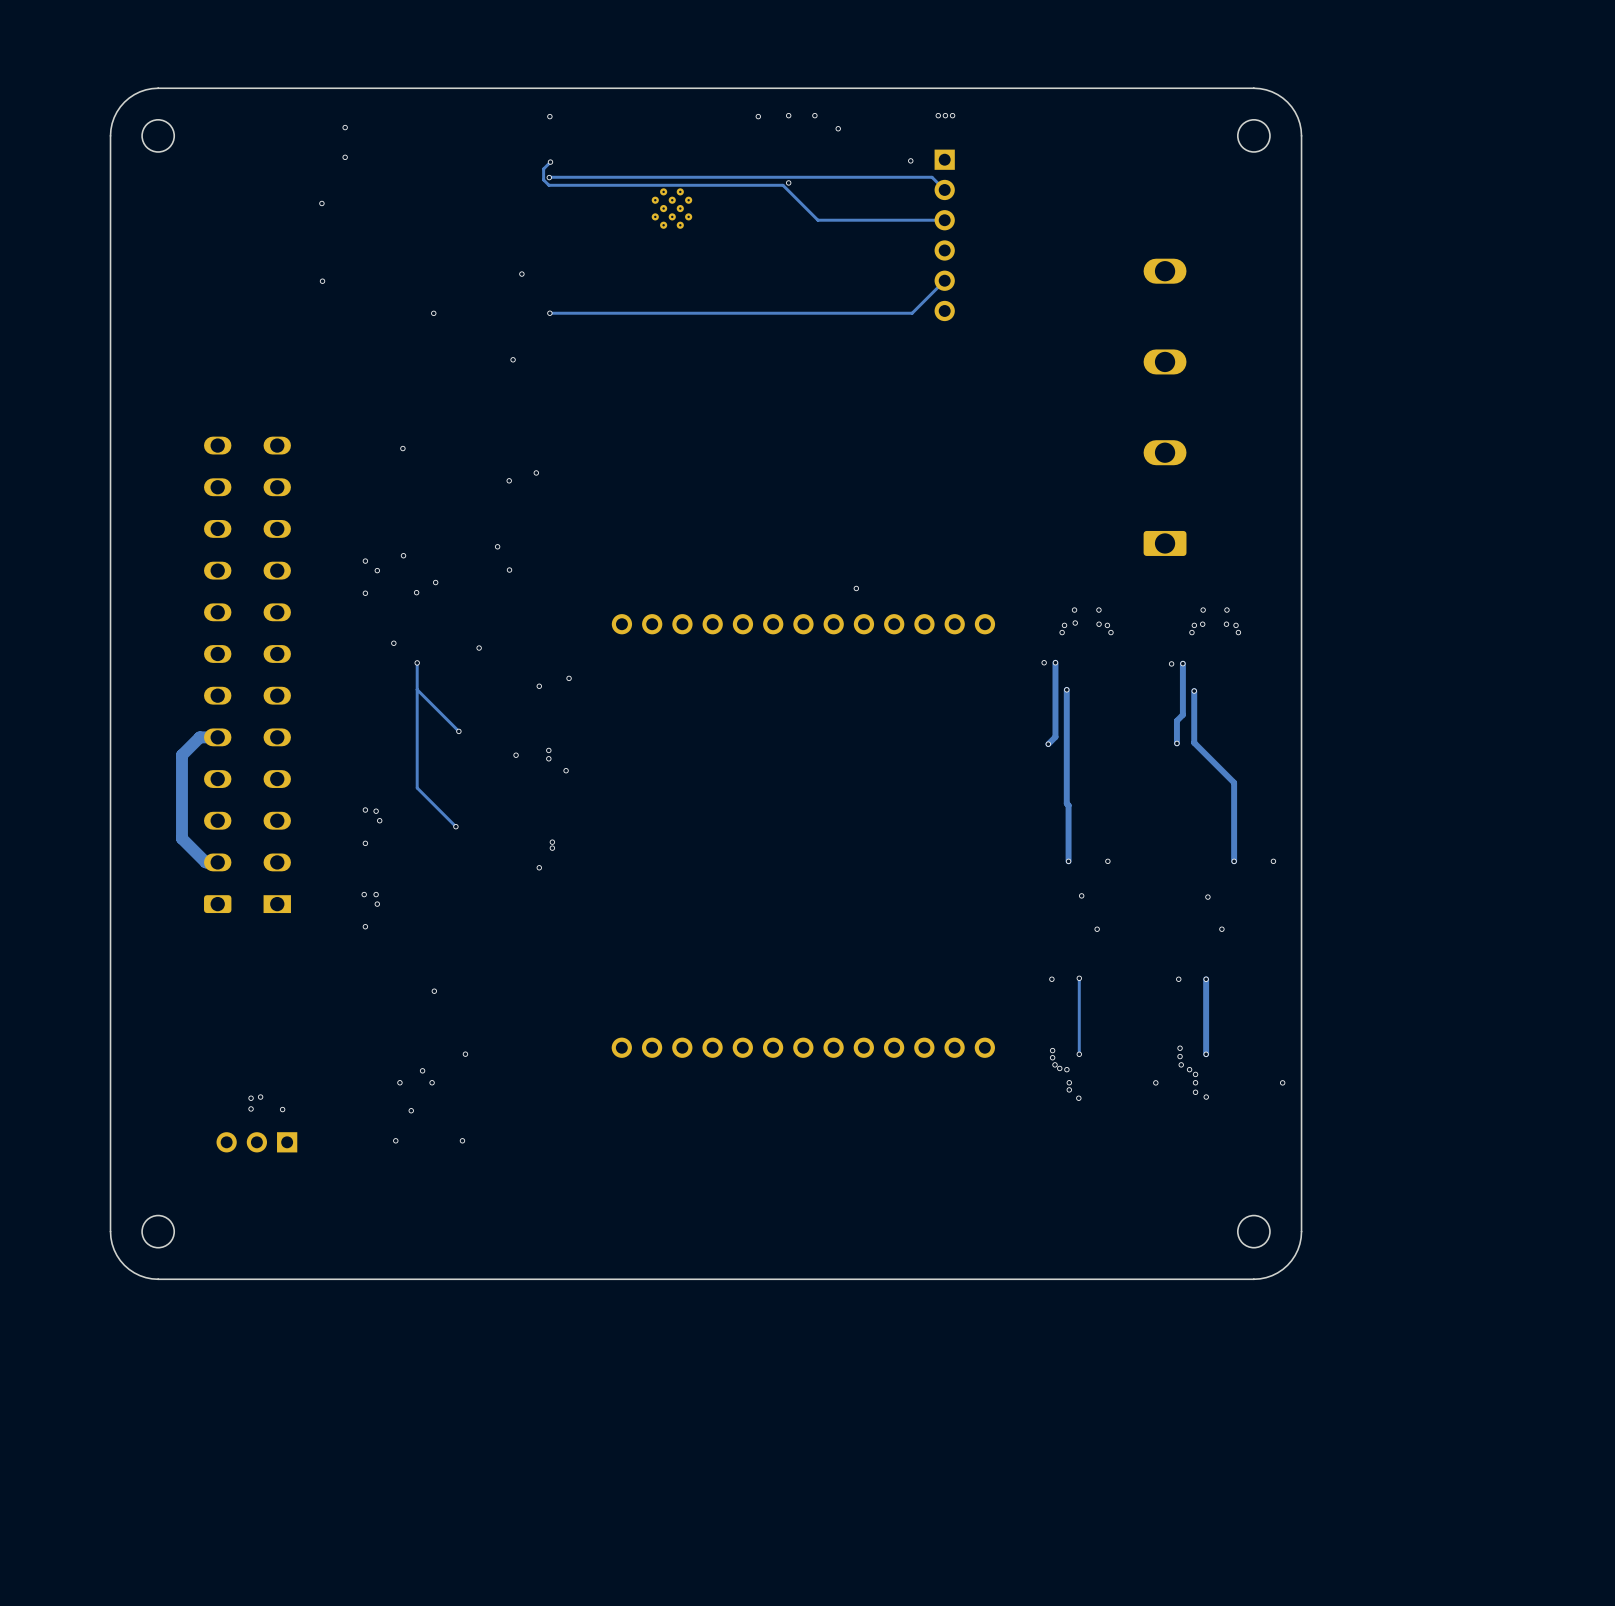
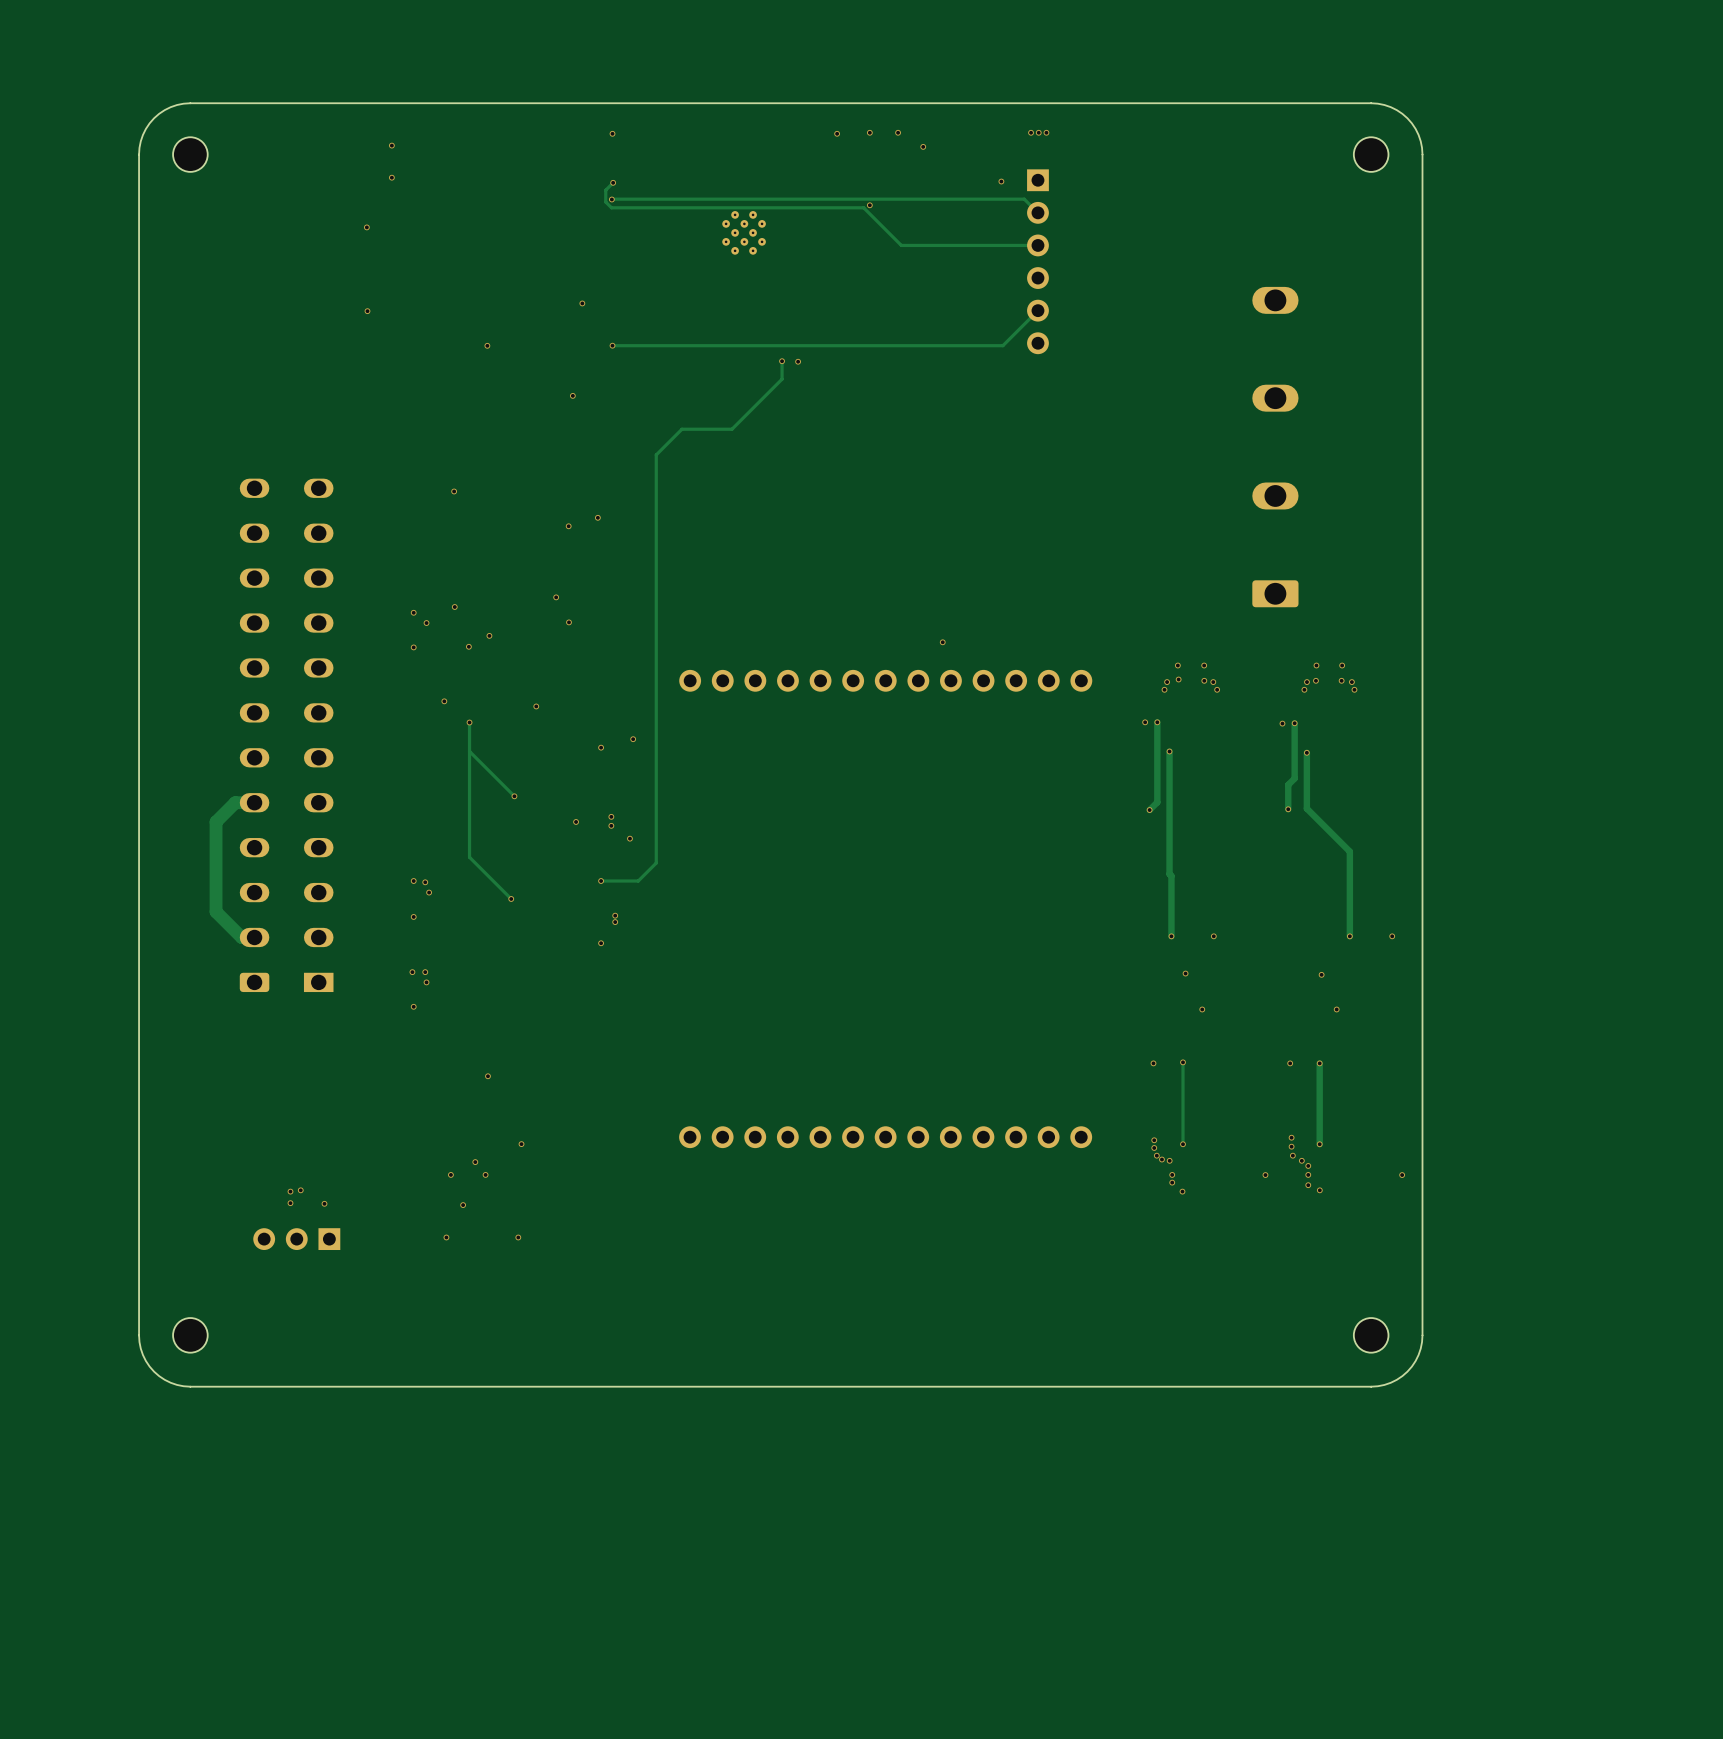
track: none -> (782, 361) (782, 379) (732, 429) (681, 429) (656, 454) (656, 863) (638, 881) (601, 881)
via: none -> (782, 361)
via: none -> (798, 361)
via: none -> (601, 881)

